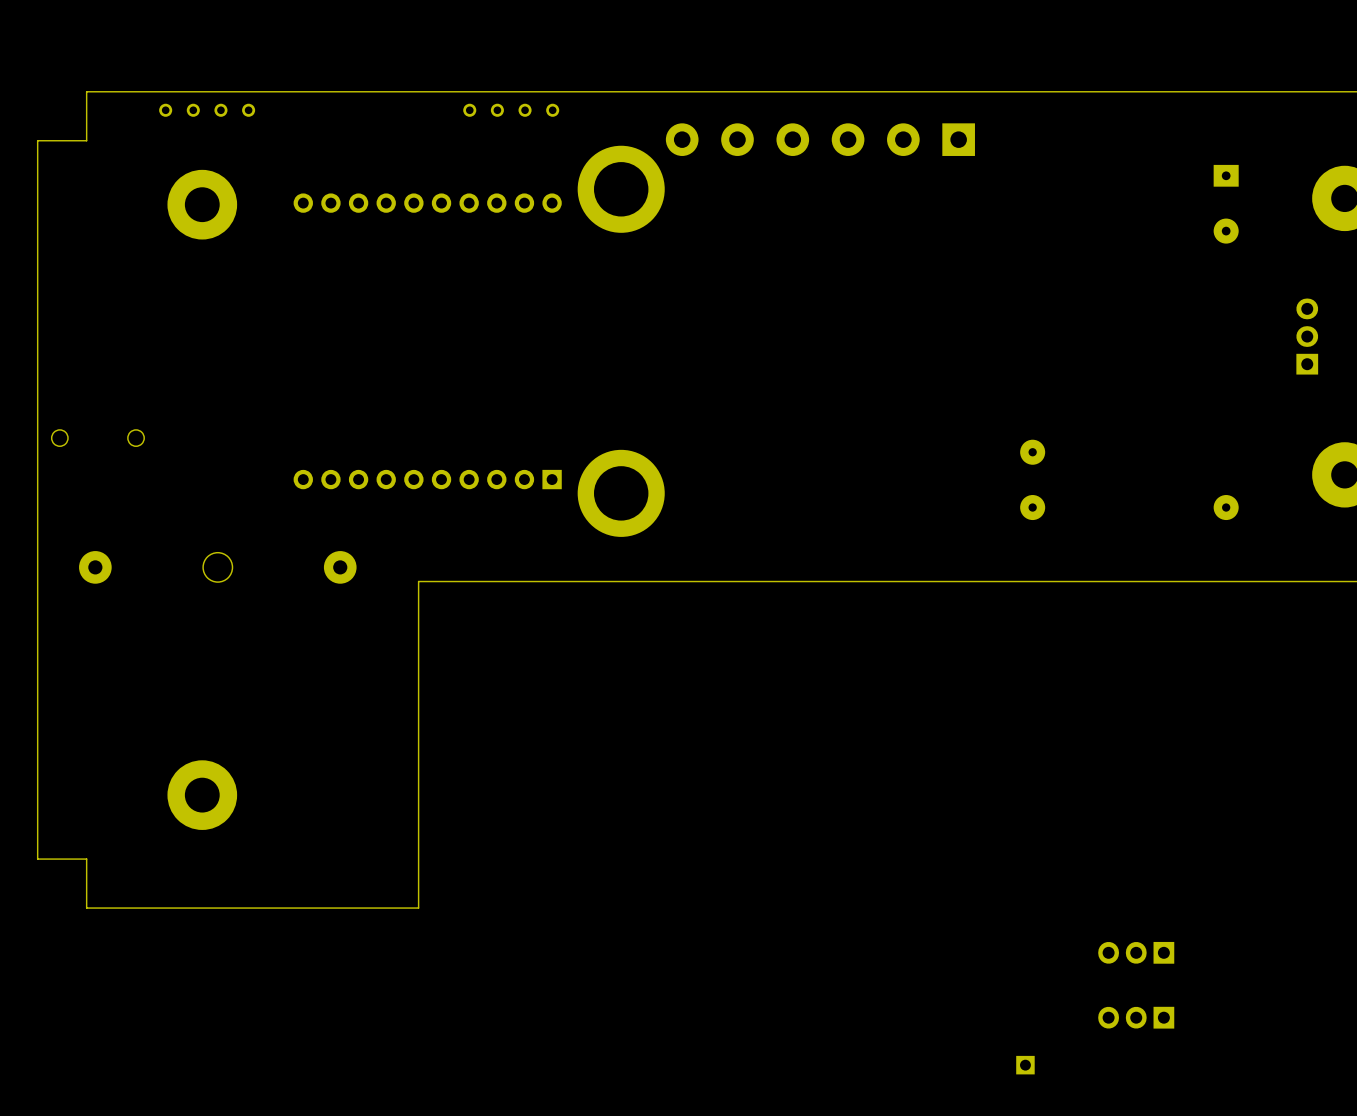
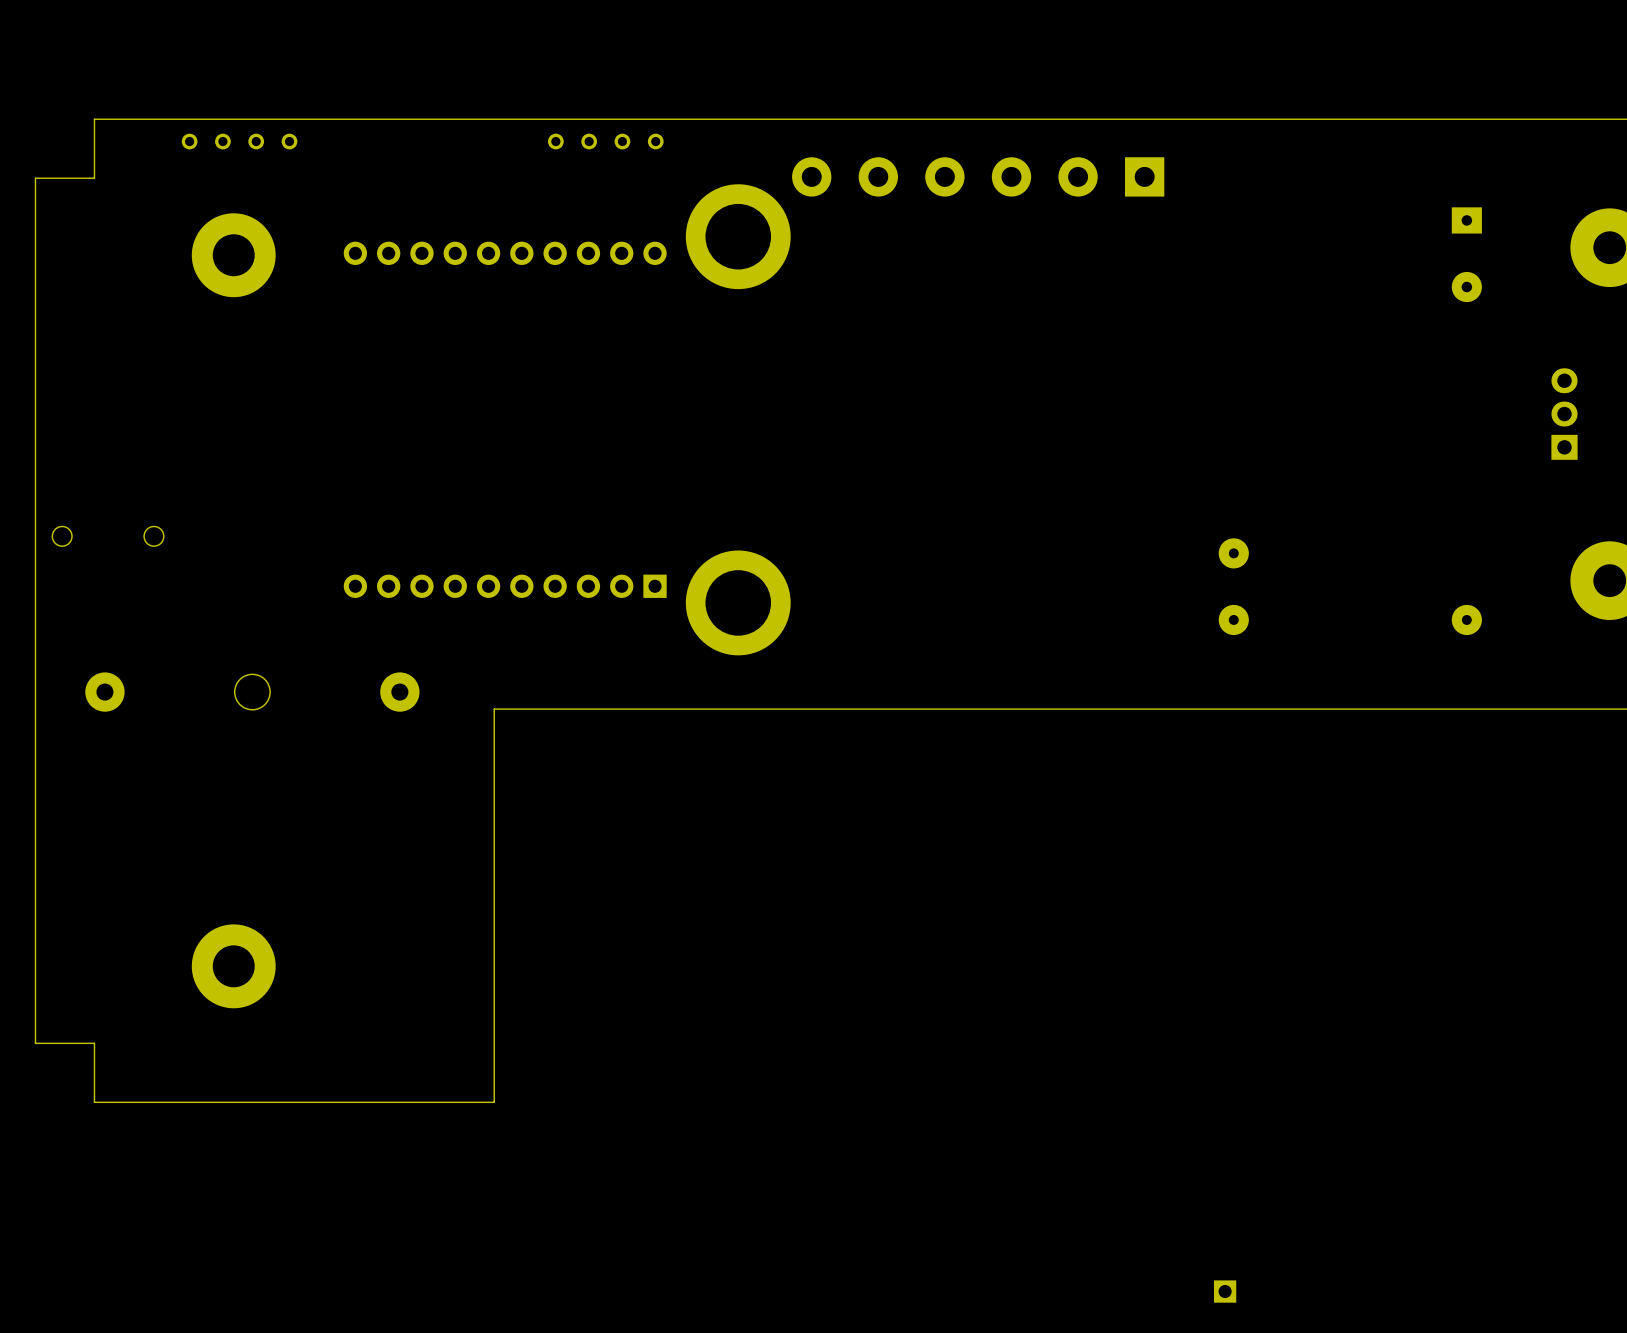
part: (1136, 952) -> none
part: (1136, 1017) -> none

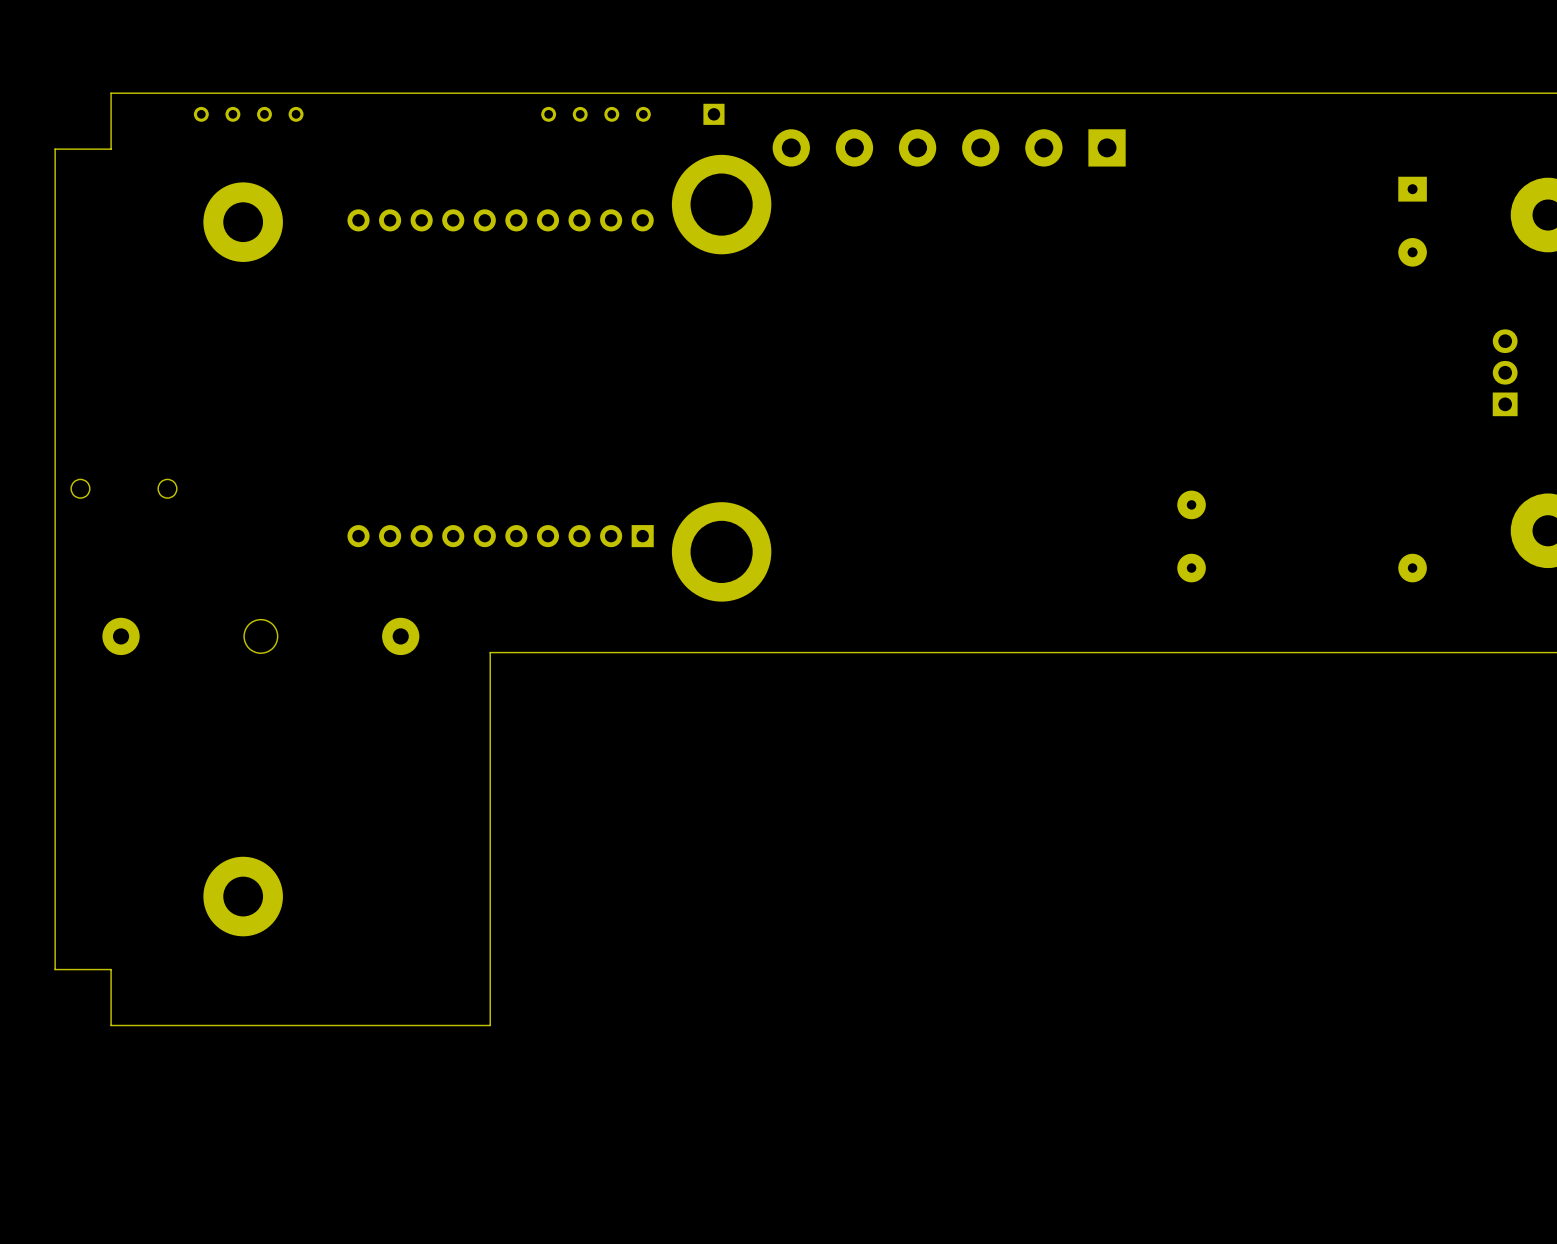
part: none -> (713, 114)
part: (1225, 1291) -> none

